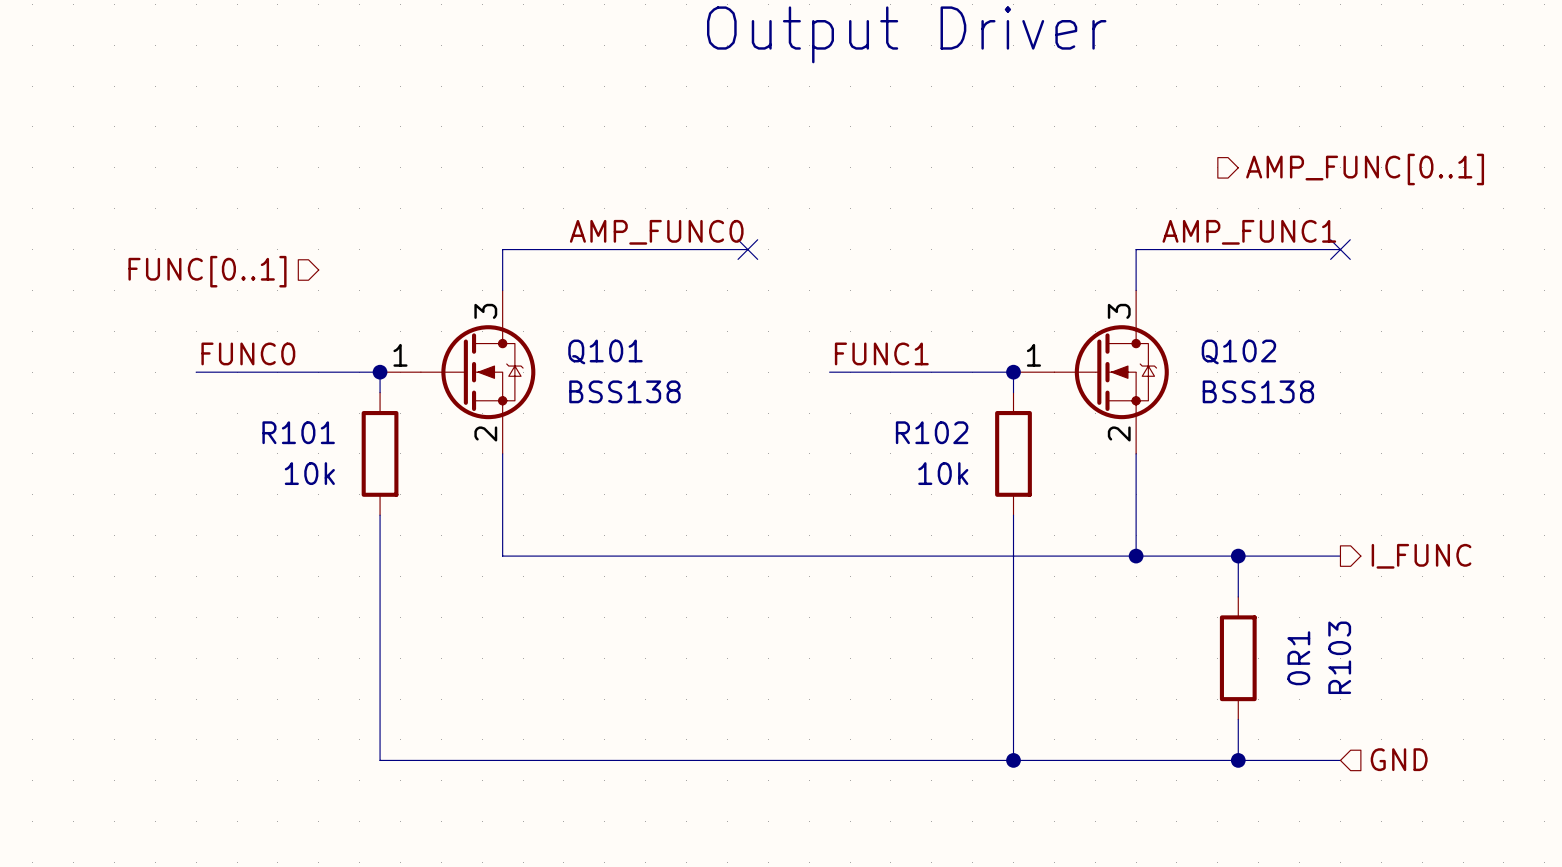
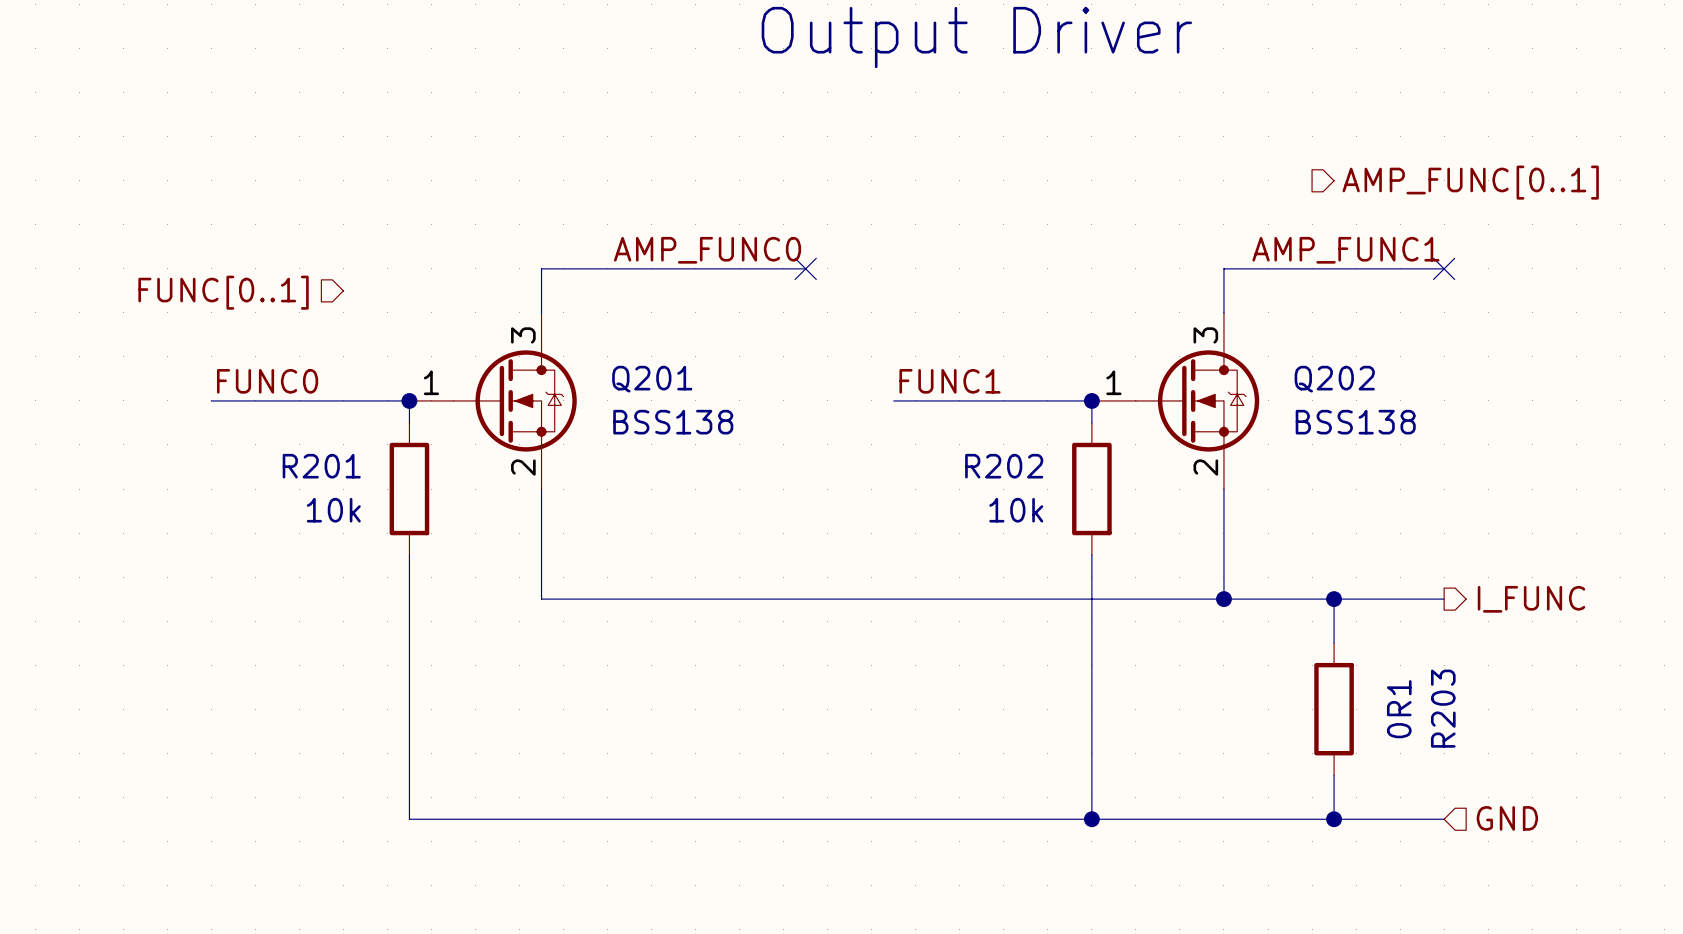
Q101 name: Q101 (605, 351) -> Q201 (652, 379)
Q102 name: Q102 (1238, 351) -> Q202 (1334, 379)
R101 name: R101 (298, 432) -> R201 (321, 466)
R102 name: R102 (932, 432) -> R202 (1004, 466)
R103 name: R103 (1339, 657) -> R203 (1443, 708)

